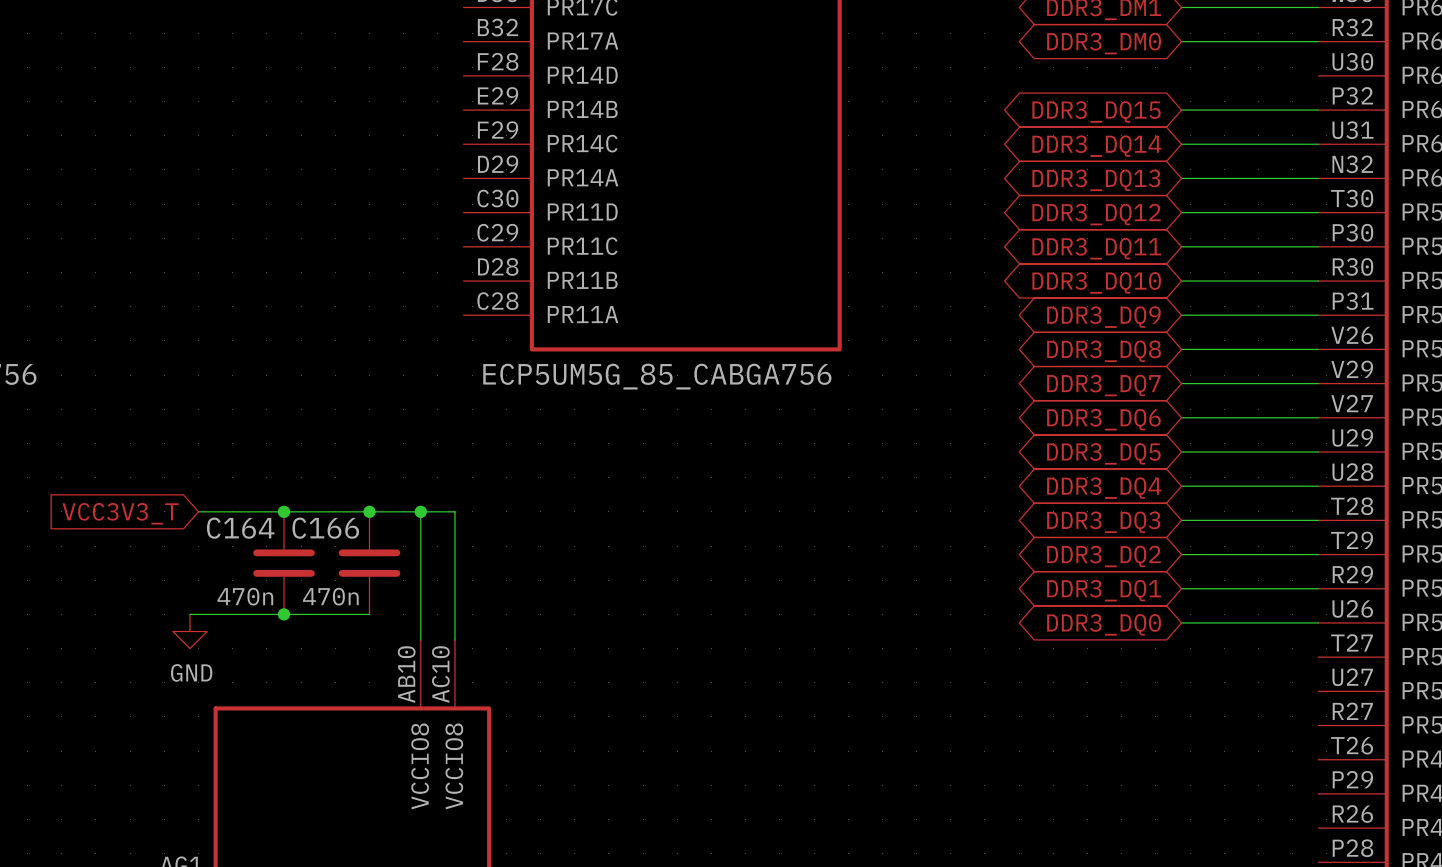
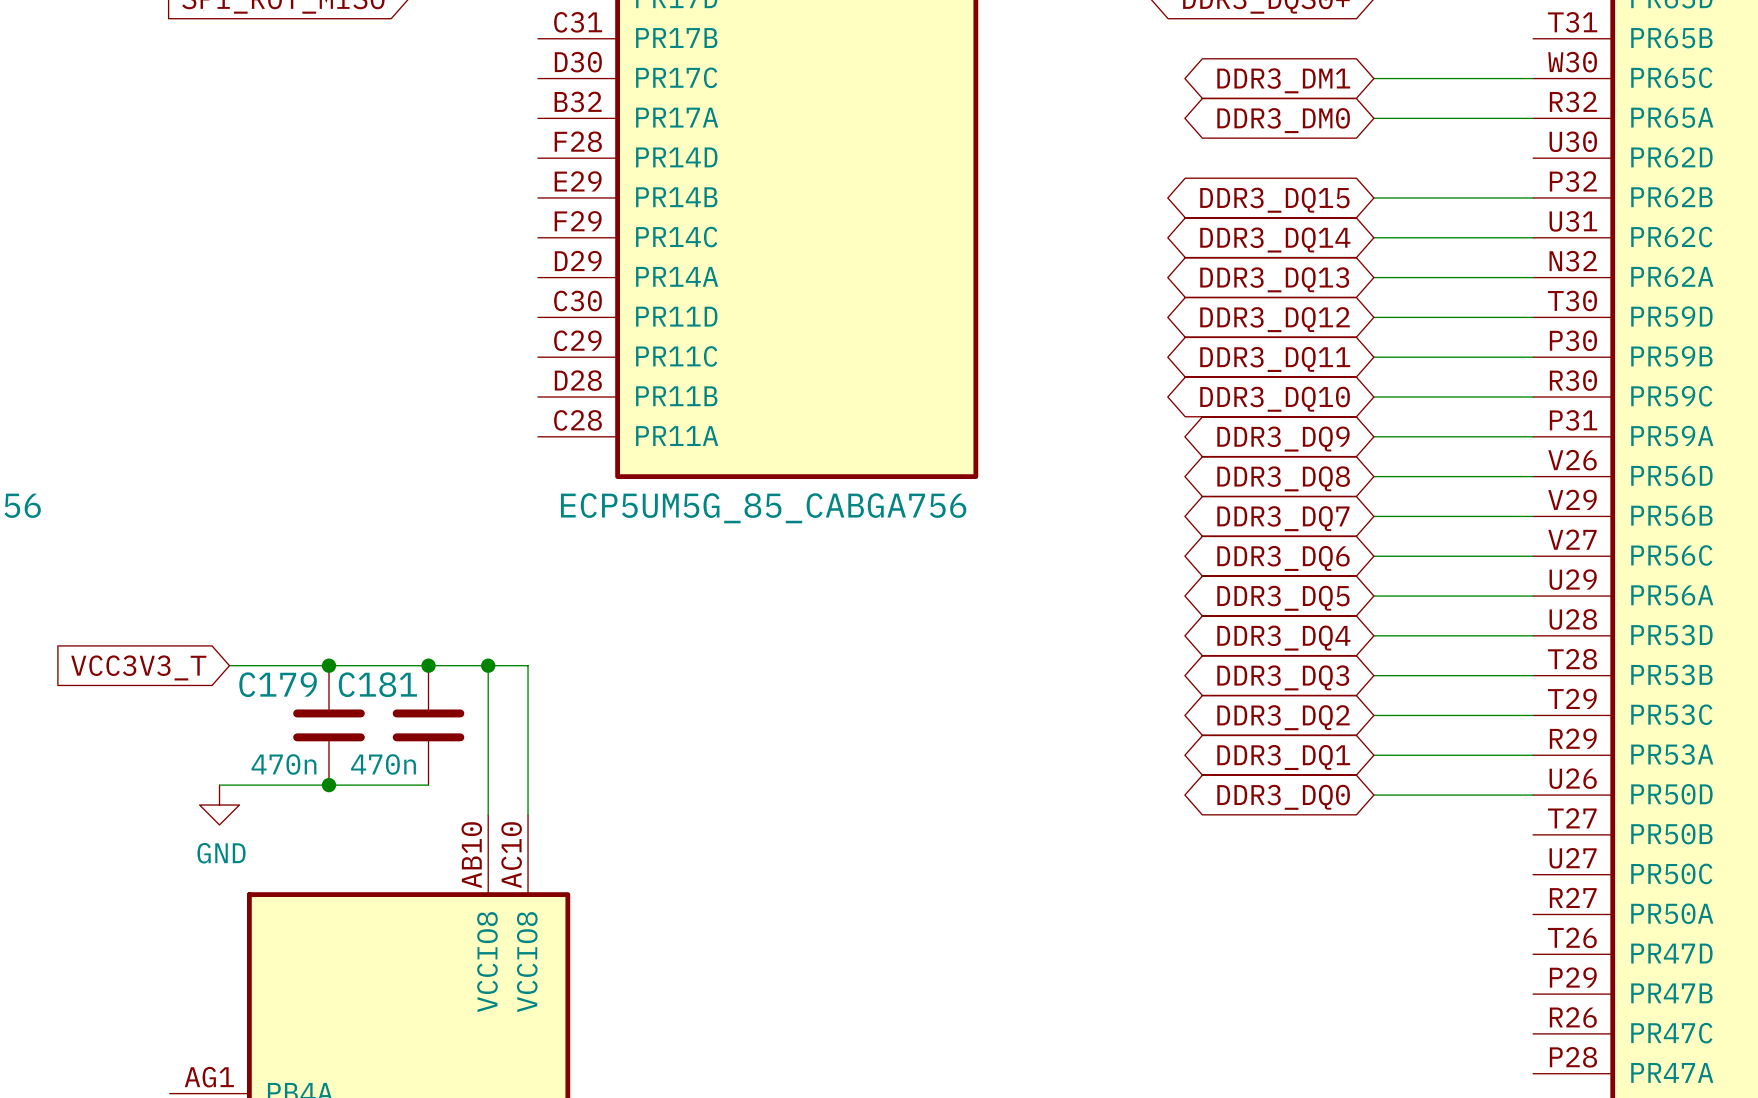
C164 name: C164 (240, 528) -> C179 (278, 684)
C166 name: C166 (325, 528) -> C181 (377, 684)

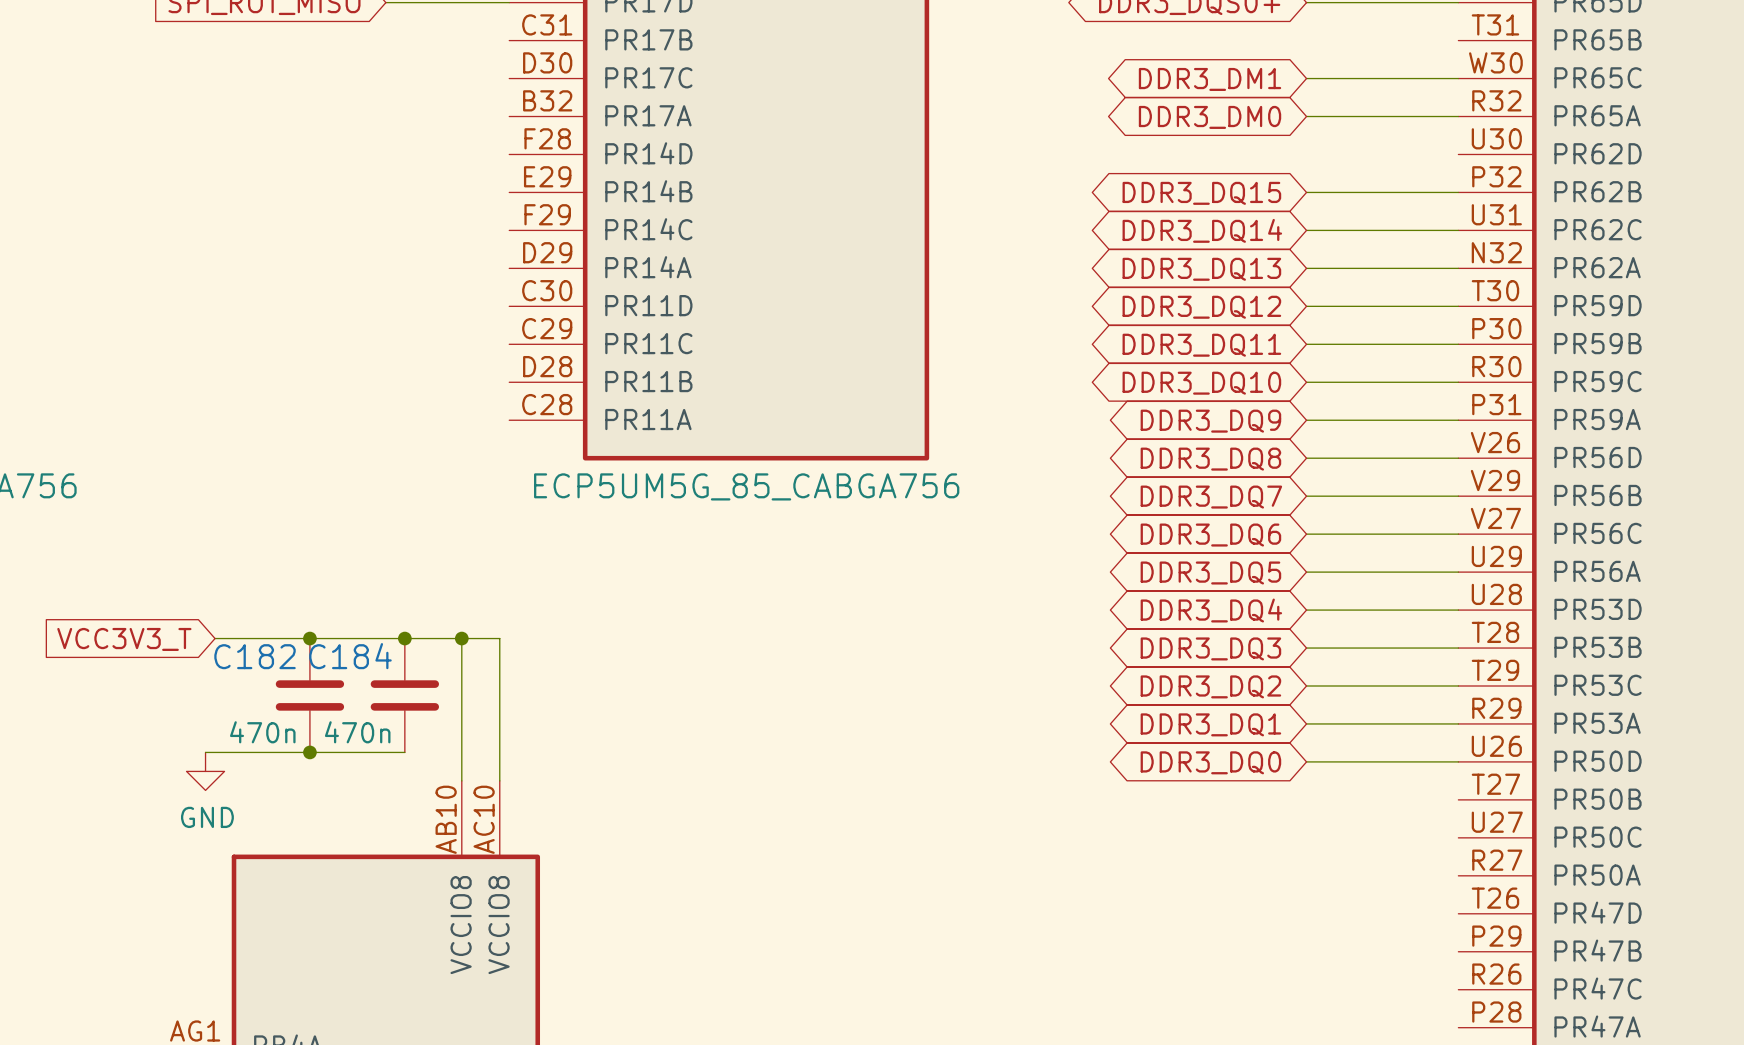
C179 name: C179 (278, 684) -> C182 (255, 656)
C181 name: C181 (377, 684) -> C184 (350, 656)

